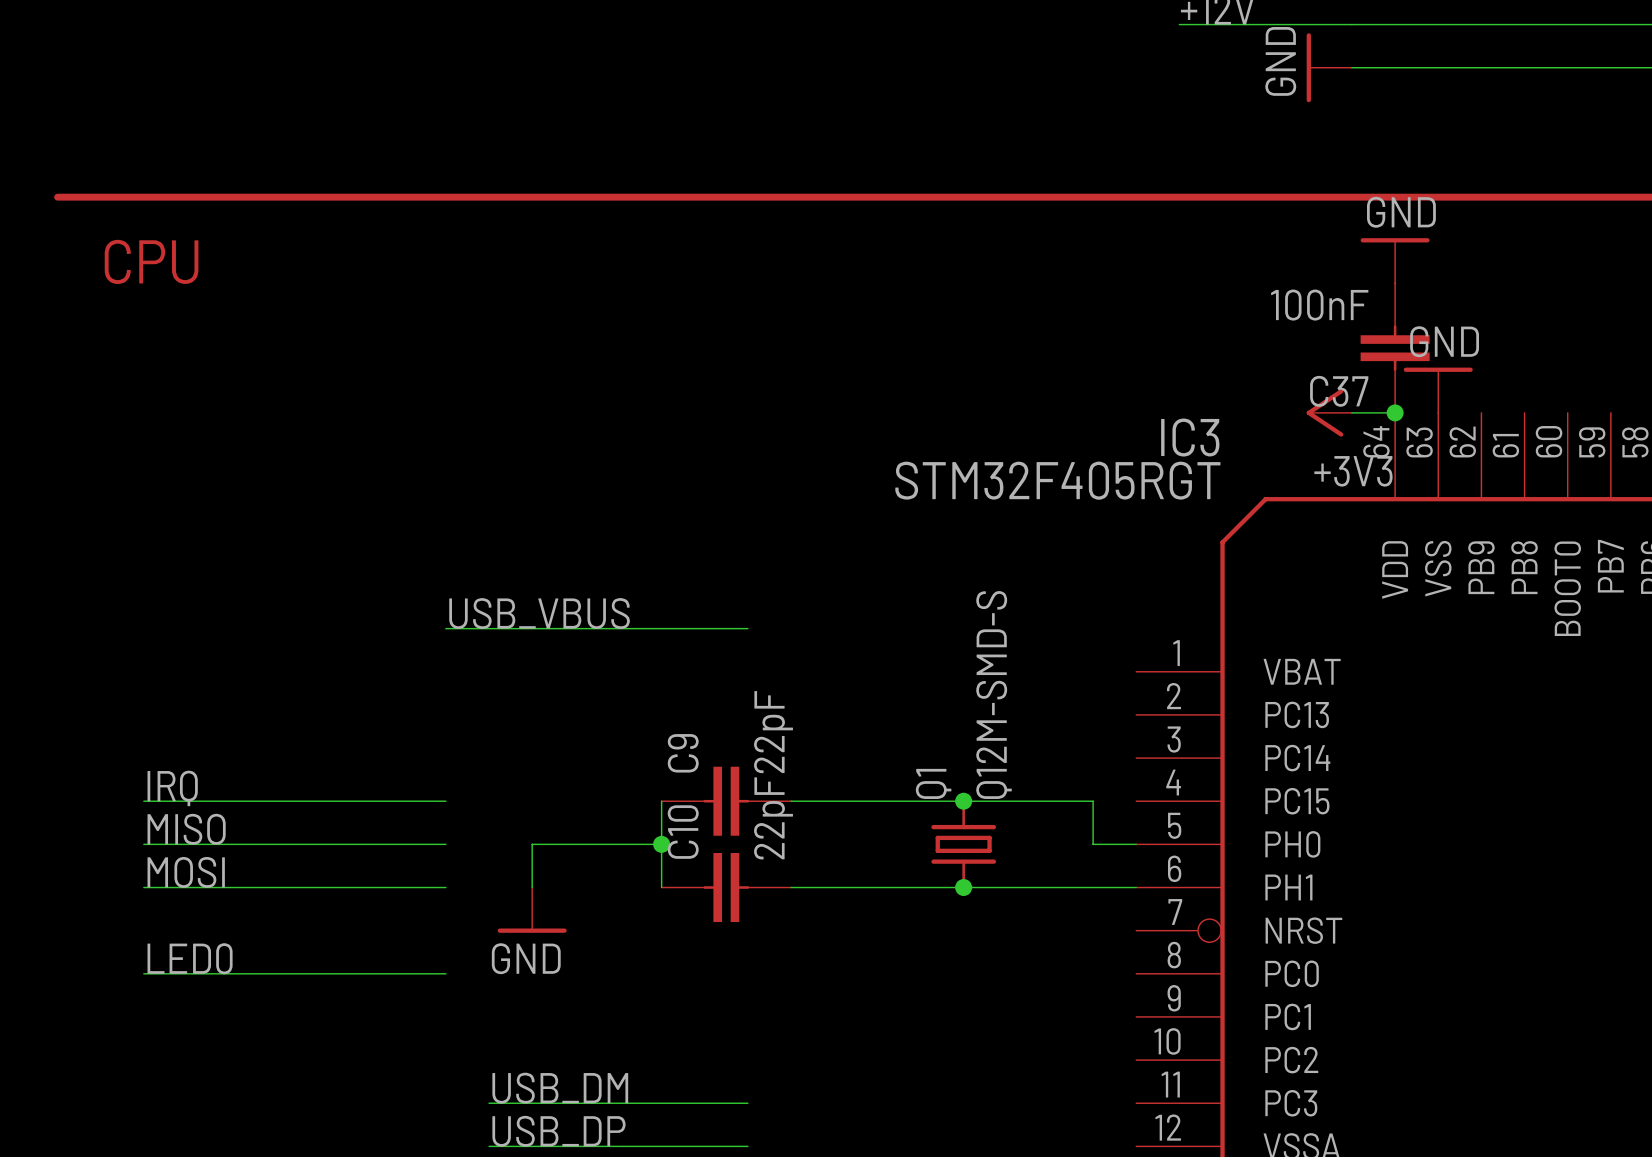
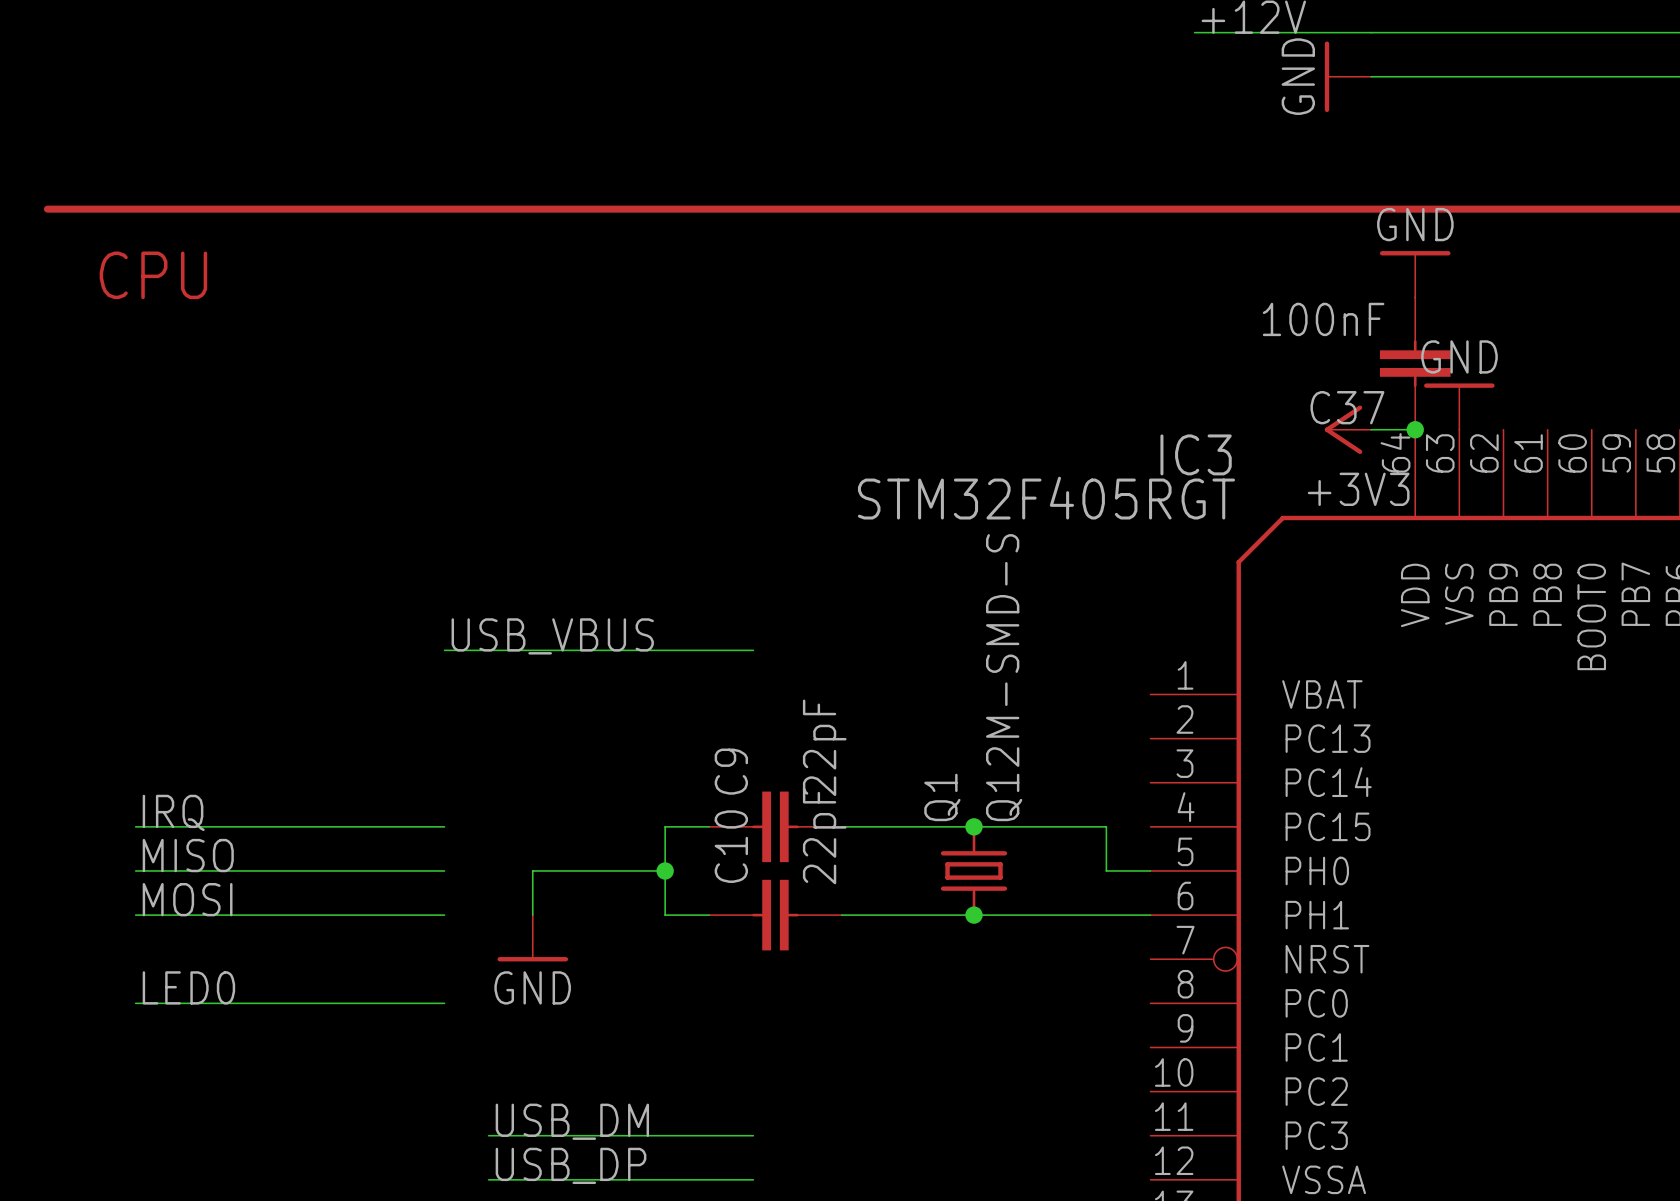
C9 position: (726, 801) -> (775, 826)
C10 position: (726, 887) -> (775, 915)

